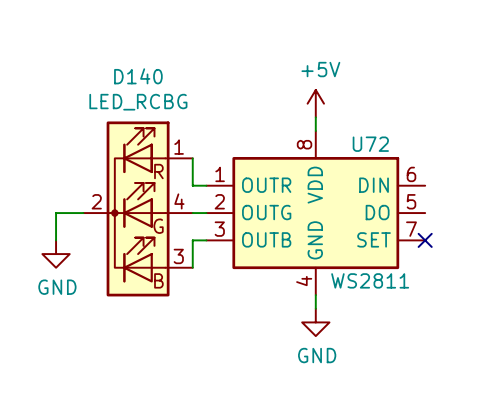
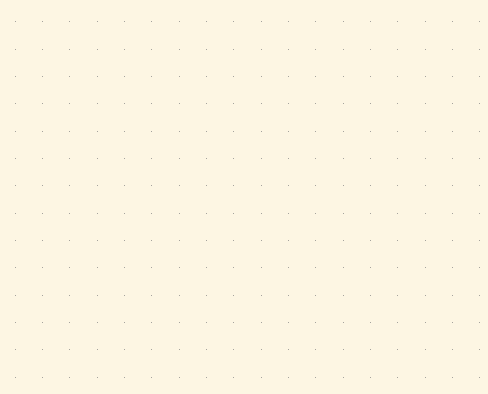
power symbol: +5V (315, 103) -> none
wire: (315, 117) (315, 131) -> none
wire: (192, 158) (192, 185) (206, 185) -> none
D140: LED_RCBG (138, 208) -> none
wire: (83, 213) (56, 213) (56, 240) -> none
wire: (192, 213) (206, 213) -> none
U72: WS2811 (315, 213) -> none
wire: (206, 240) (192, 240) (192, 267) -> none
no-connect mark: (425, 240) -> none
power symbol: GND (56, 254) -> none
wire: (315, 295) (315, 308) -> none
power symbol: GND (315, 322) -> none

